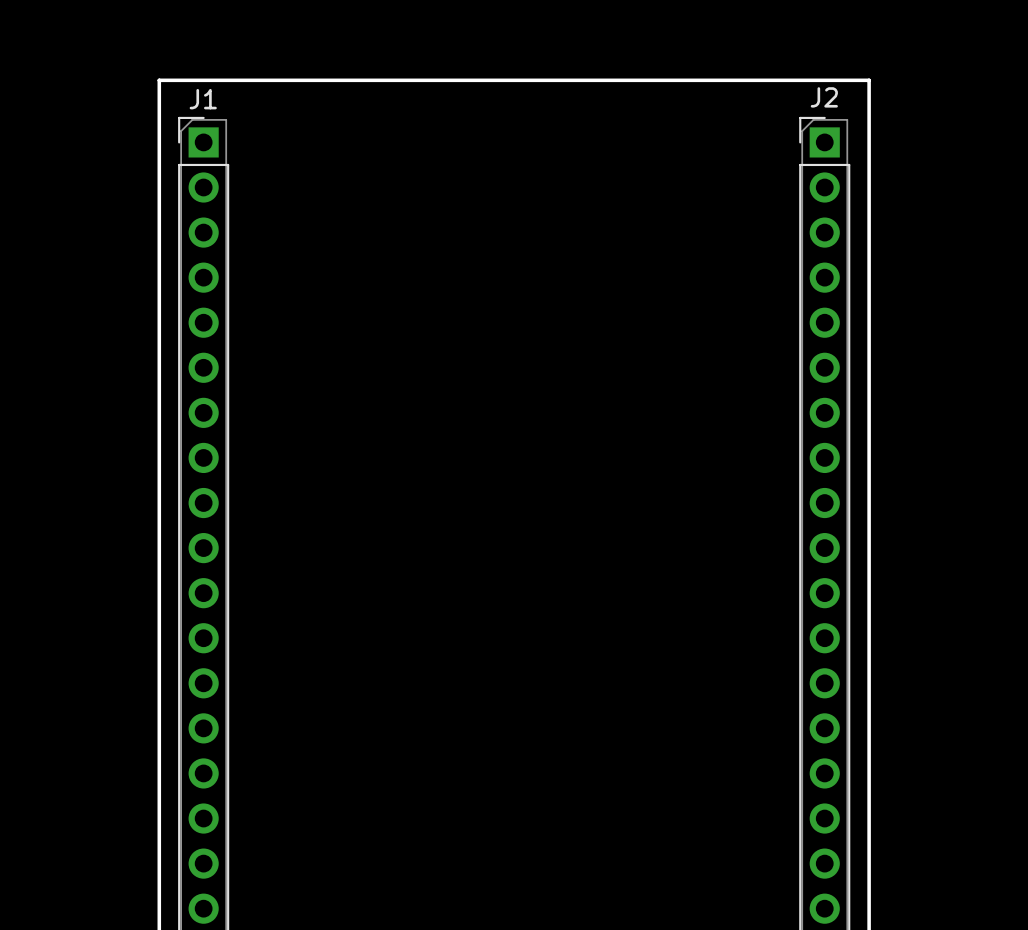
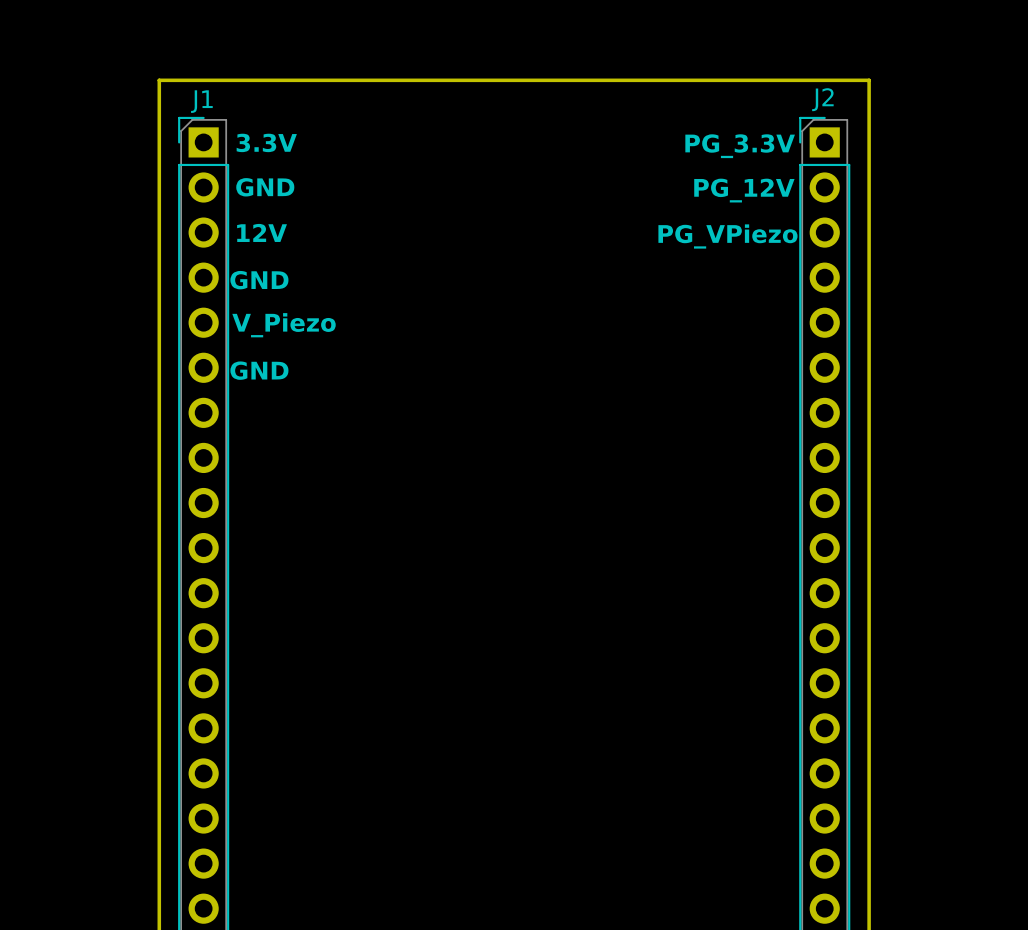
text: none -> 3.3V (266, 142)
text: none -> PG_3.3V (740, 146)
text: none -> GND (265, 187)
text: none -> PG_12V (744, 190)
text: none -> 12V (262, 232)
text: none -> PG_VPiezo (727, 236)
text: none -> GND (259, 280)
text: none -> V_Piezo (284, 325)
text: none -> GND (259, 370)

